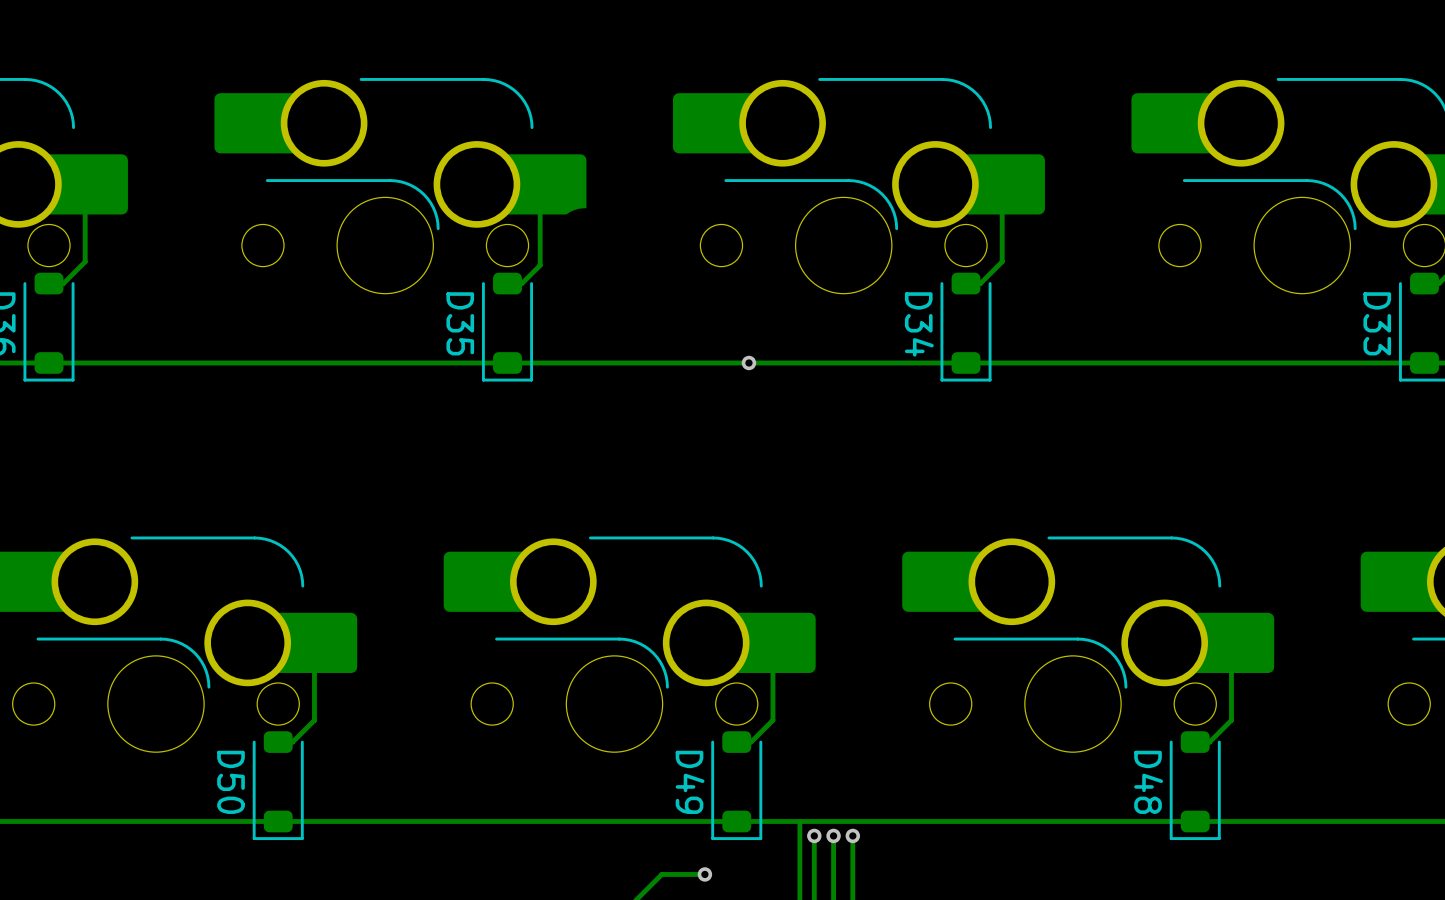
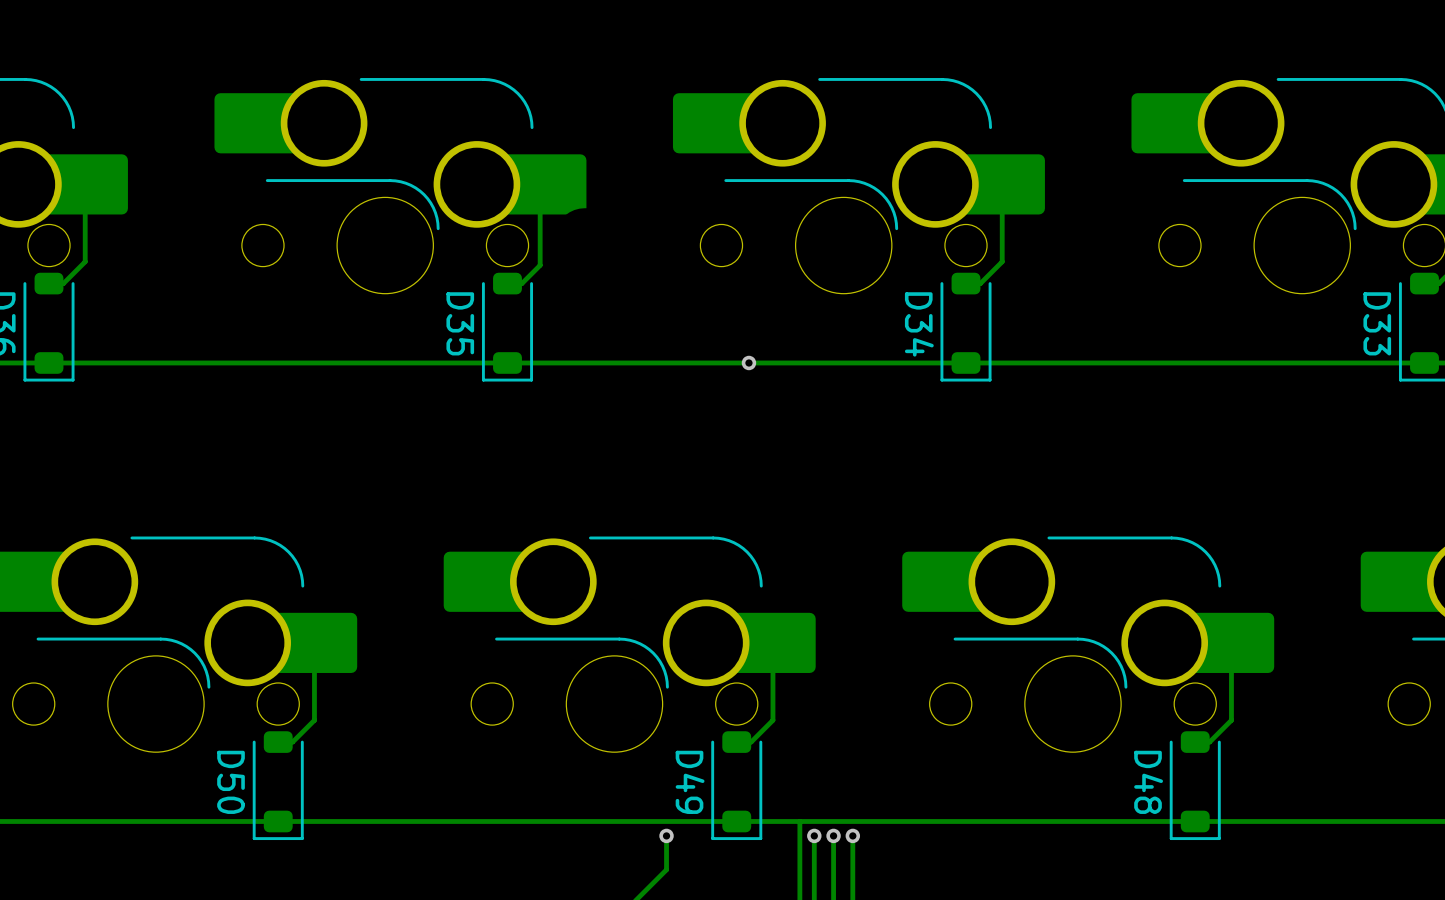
track: (704, 874) (661, 874) -> (666, 835) (666, 869) (661, 874)
via position: (704, 874) -> (666, 835)

